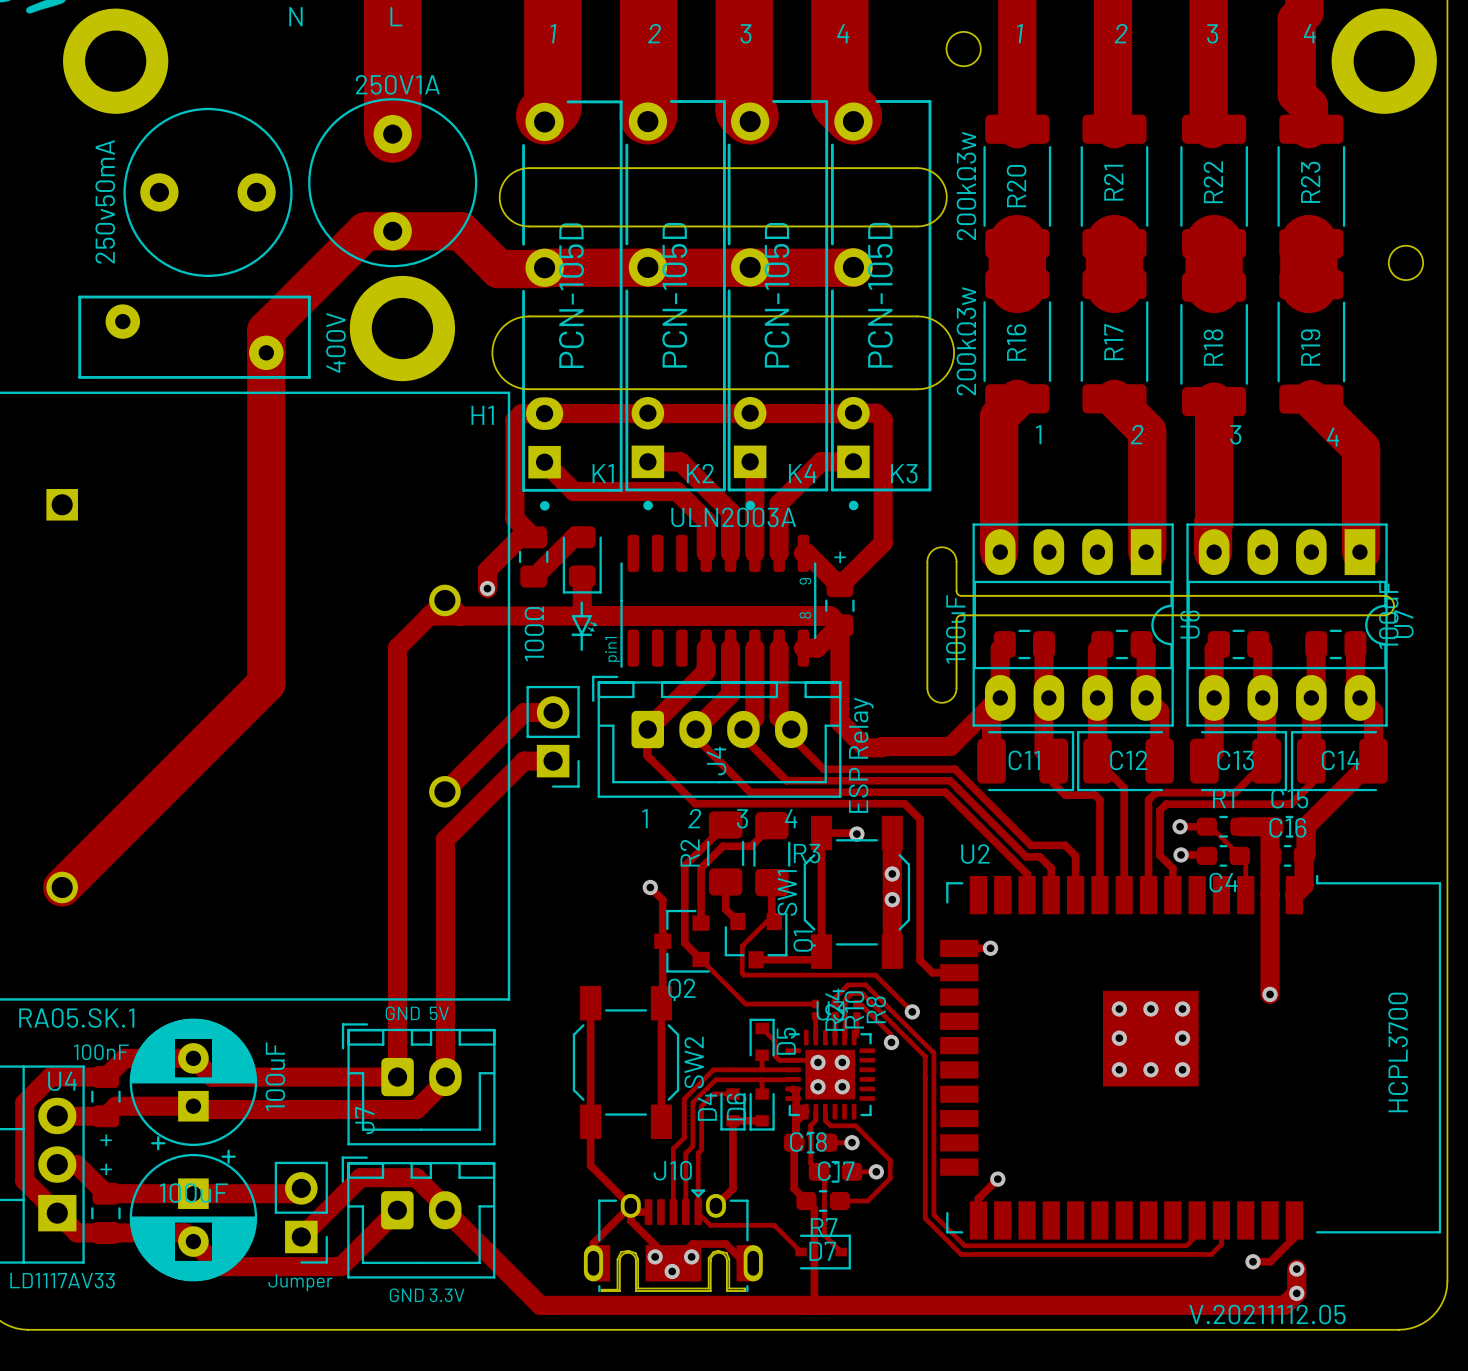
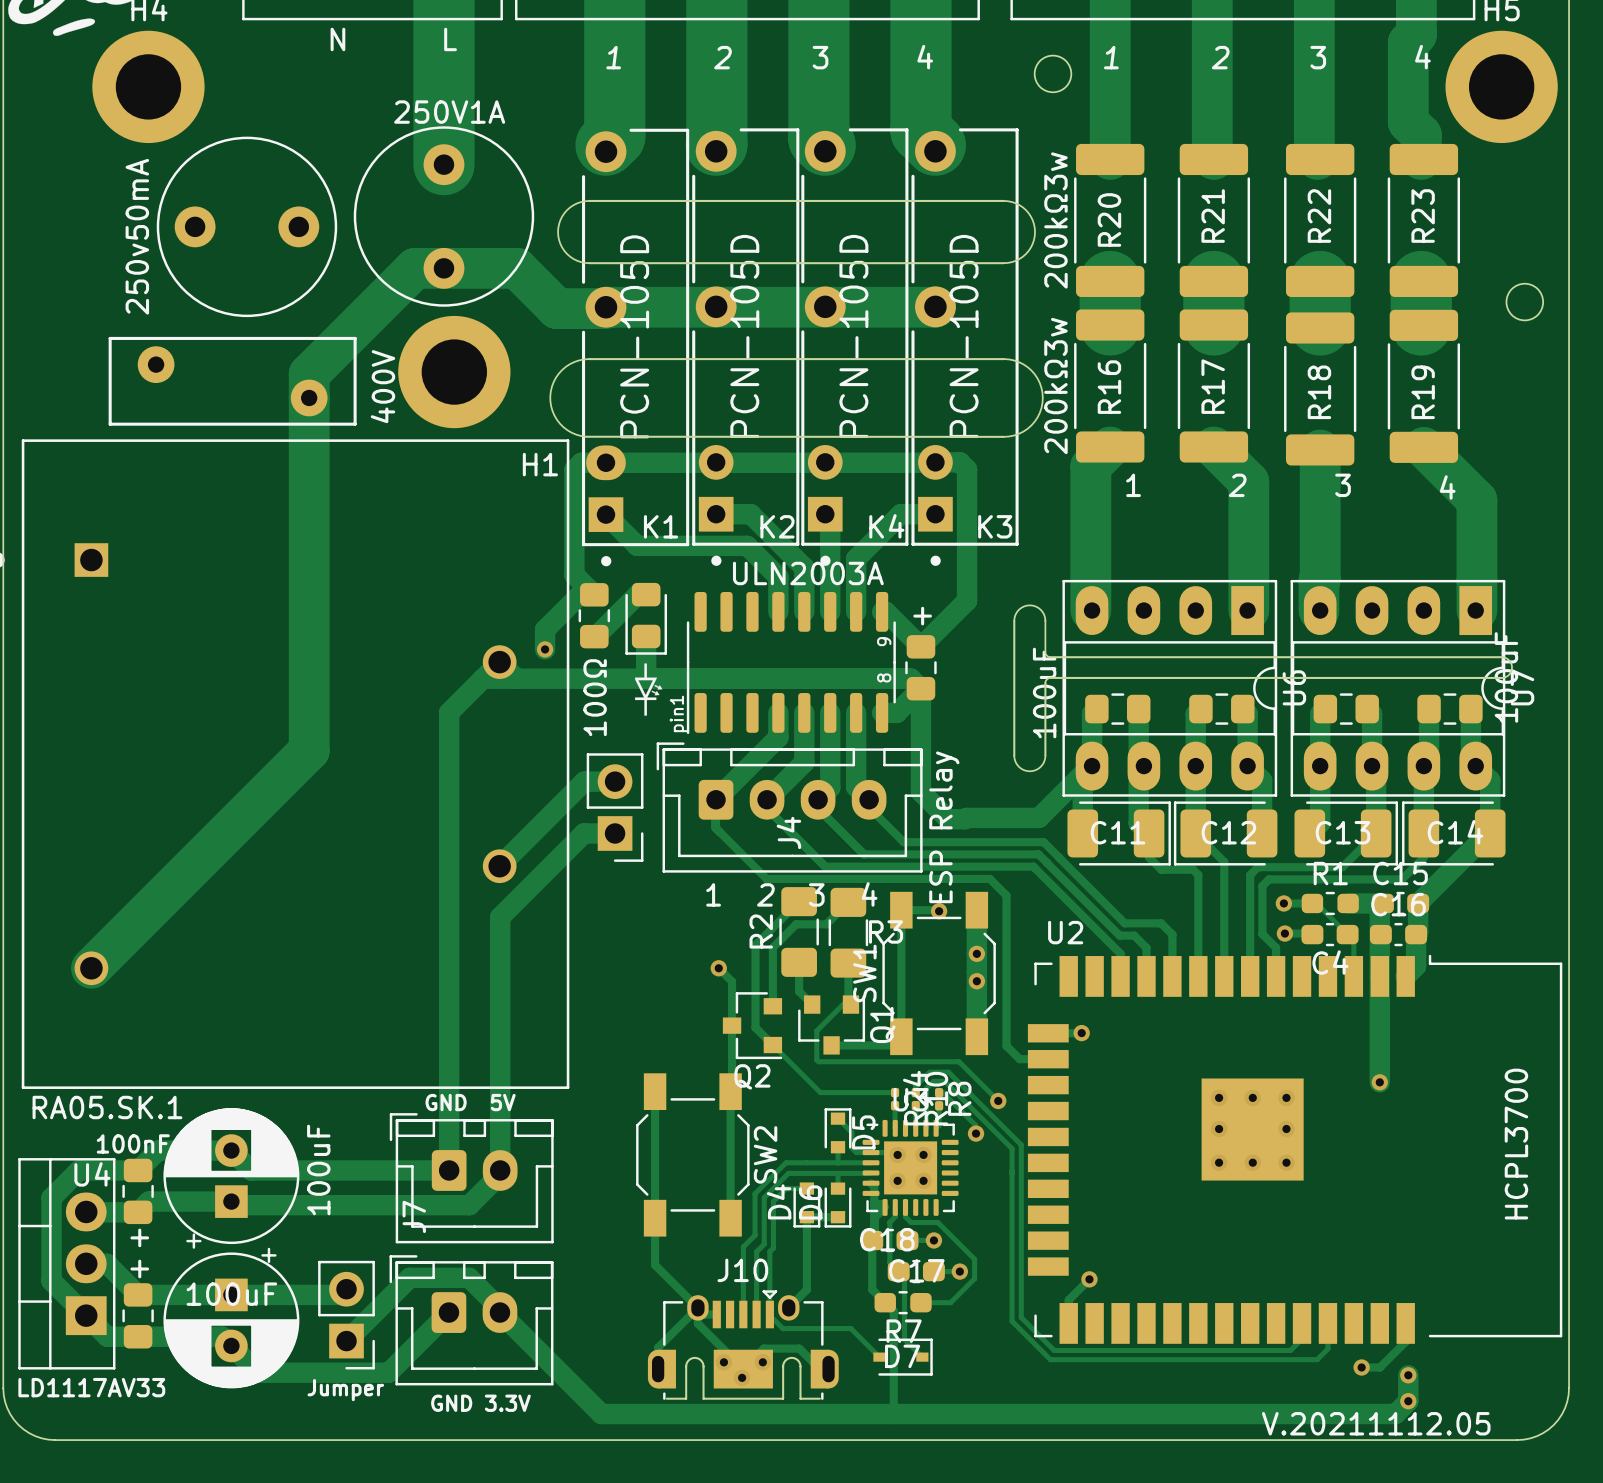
board edge: (601, 1291) (617, 1289) (617, 1259) (621, 1252) (628, 1250) (635, 1253) (638, 1259) (638, 1288) (708, 1288) (708, 1258) (713, 1252) (718, 1250) (726, 1253) (729, 1259) (729, 1288) (745, 1288) (745, 1291) -> none

